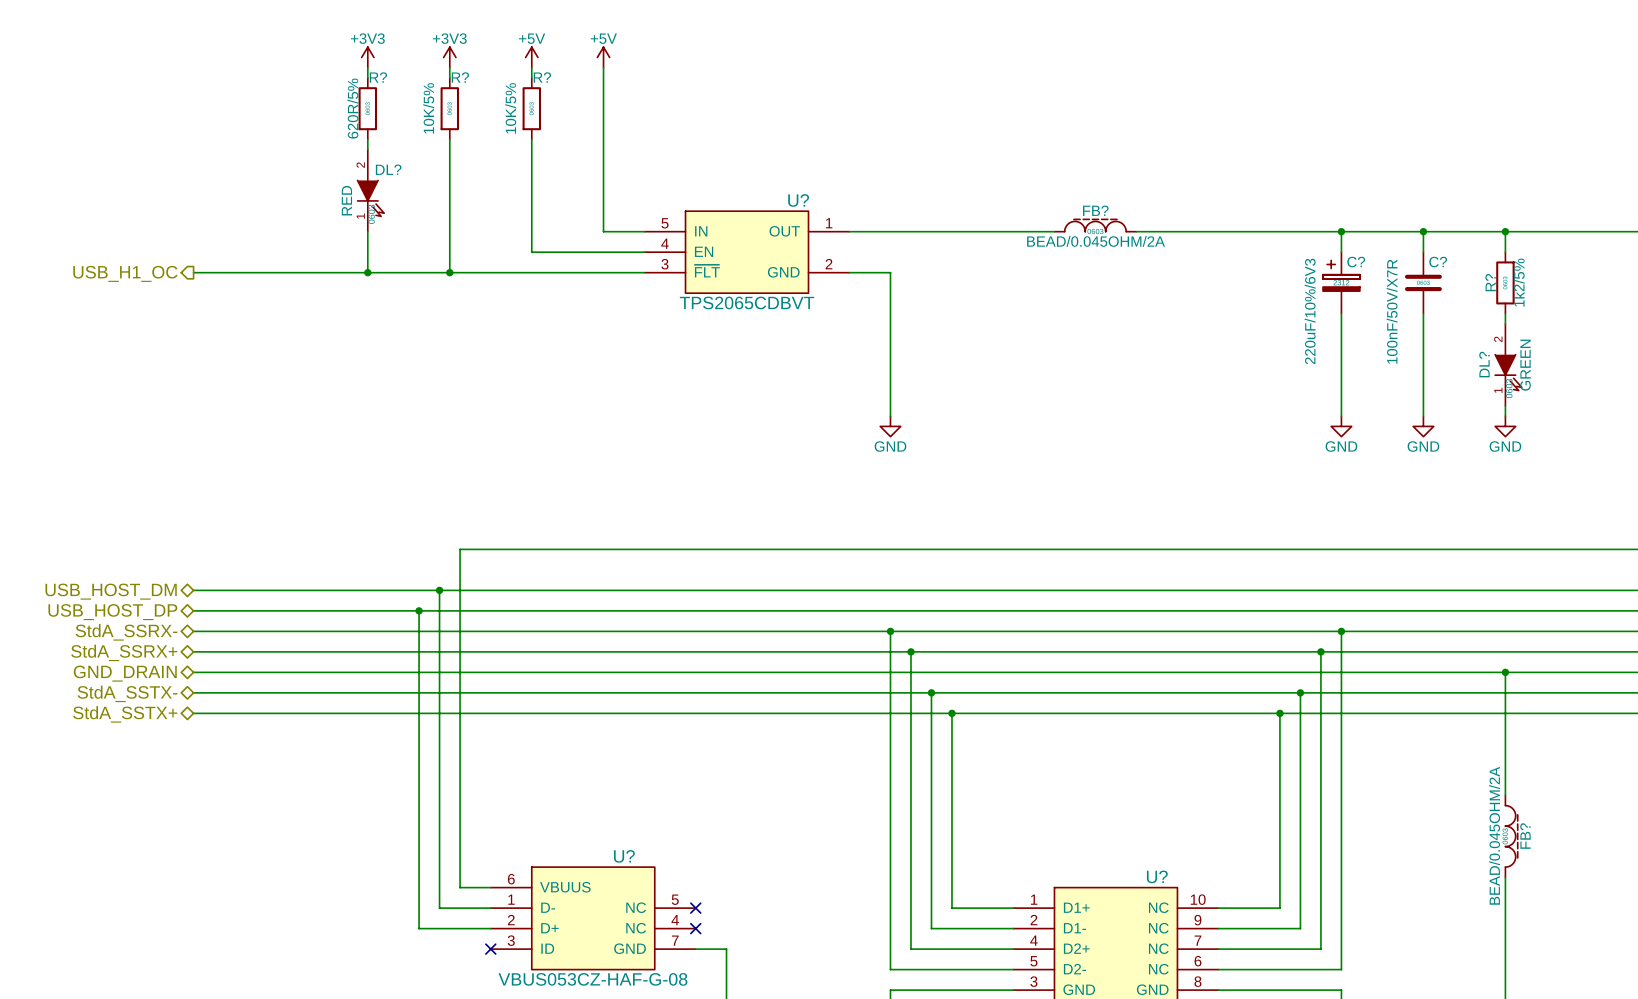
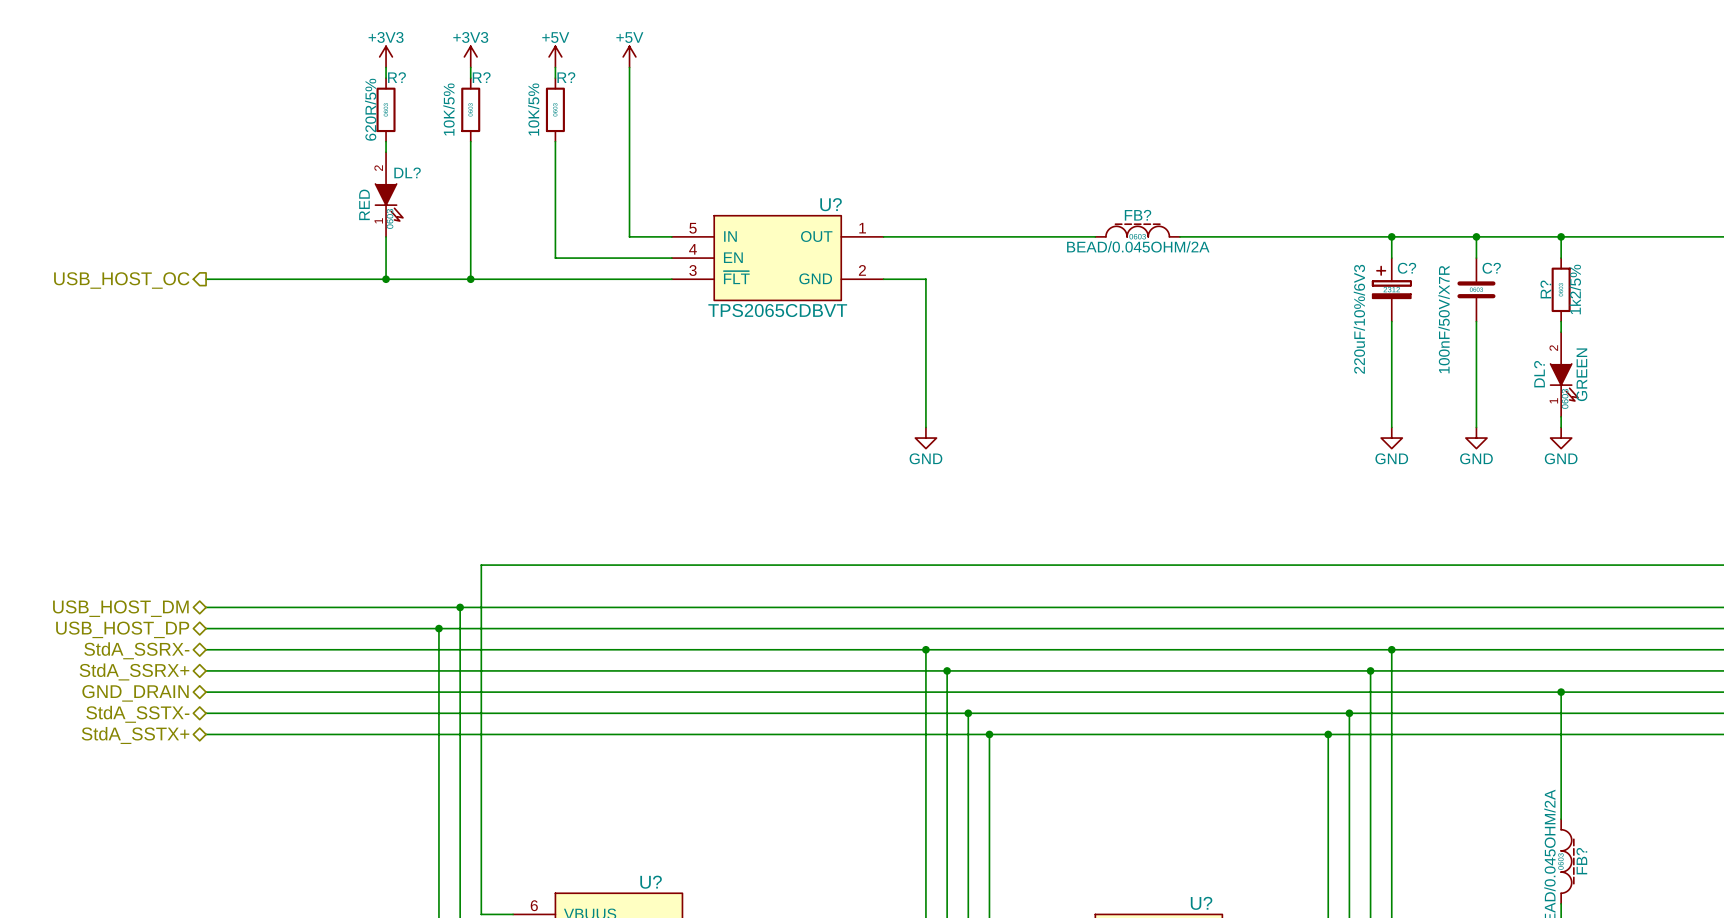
hierarchical label: USB_H1_OC (125, 273) -> USB_HOST_OC (121, 280)

